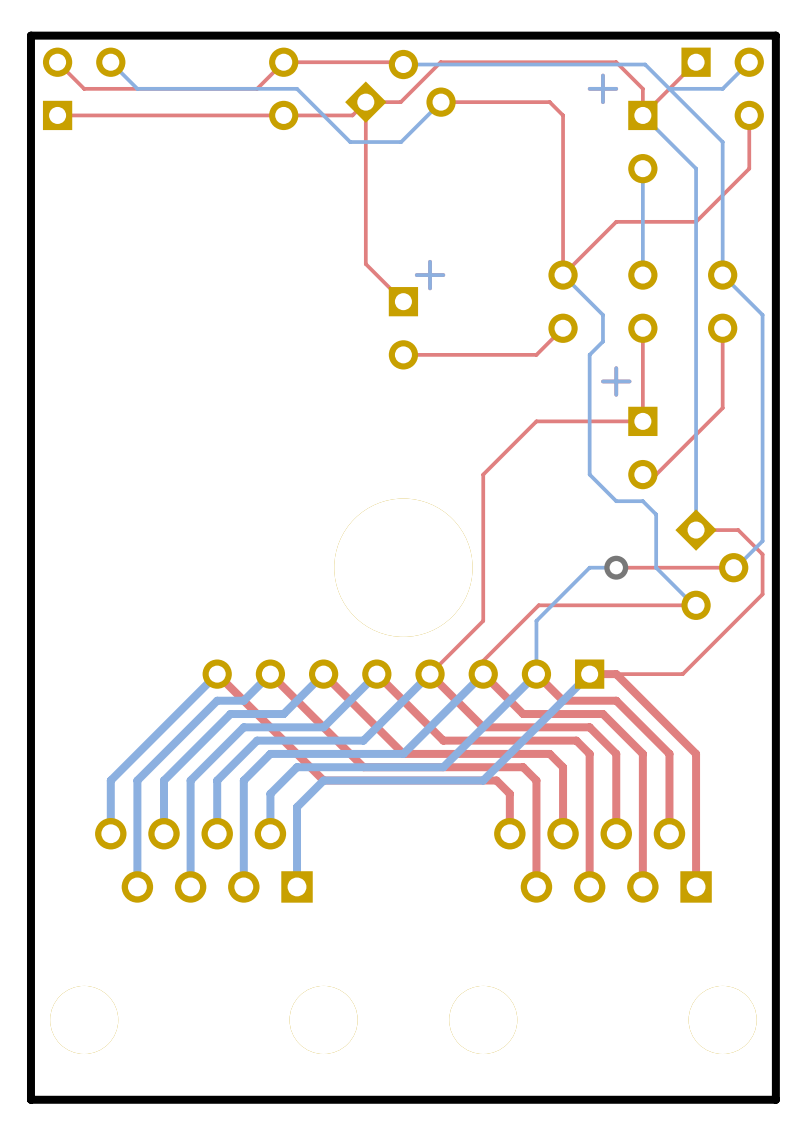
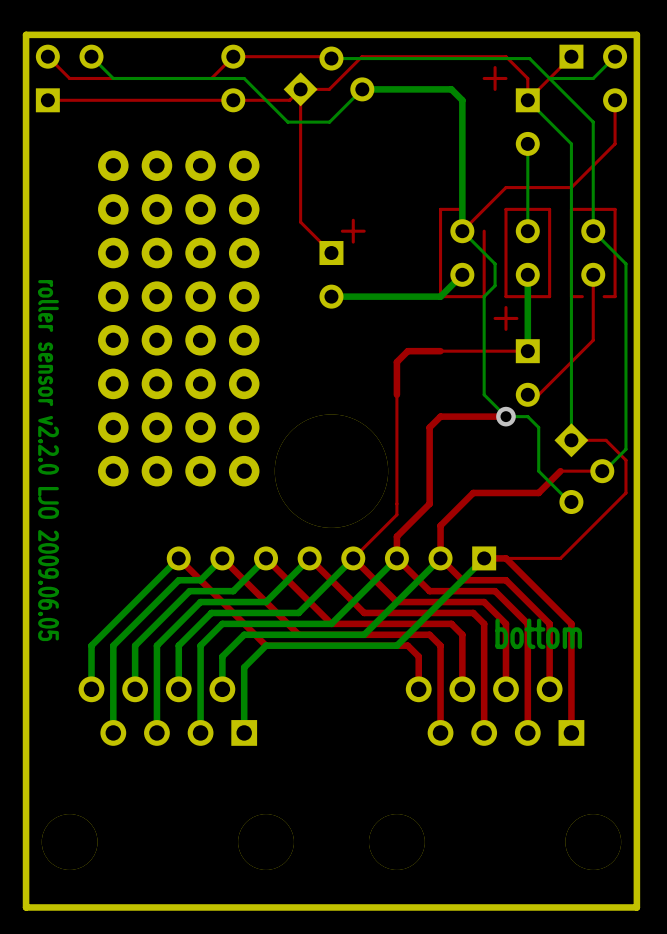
bottom track: (602, 75) (602, 102) -> none
bottom track: (616, 88) (589, 88) -> none
bottom track: none -> (362, 89) (451, 89) (462, 100) (462, 231)
top track: (441, 102) (549, 102) (563, 115) (563, 275) -> none
top track: none -> (462, 209) (440, 209) (440, 296) (484, 296) (484, 231)
top track: none -> (549, 209) (505, 209) (505, 296) (549, 296) (549, 209)
bottom track: (430, 261) (430, 288) -> none
bottom track: (443, 275) (416, 275) -> none
bottom track: none -> (462, 274) (440, 296) (331, 296)
top track: (563, 328) (536, 354) (403, 354) -> none
bottom track: none -> (527, 274) (527, 351)
top track: (642, 328) (642, 421) -> none
top track: none -> (604, 296) (615, 296) (615, 209) (571, 209) (571, 296) (582, 296)
bottom track: (616, 368) (616, 394) -> none
part: none -> (178, 318)
bottom track: (629, 381) (602, 381) -> none
top track: (536, 421) (483, 474) -> (440, 351) (407, 351) (396, 362) (396, 394)
text: none -> roller sensor v2.2.0 LJO 2009.06.05 (48, 460)
bottom track: (616, 567) (589, 567) (536, 620) (536, 674) -> none
via position: (616, 567) -> (505, 416)
top track: (682, 567) (616, 567) -> (560, 471) (538, 492) (473, 492) (440, 525) (440, 558)
top track: (696, 605) (538, 605) (483, 660) -> (505, 416) (440, 416) (429, 427) (429, 503) (396, 536) (396, 547)
text: none -> bottom (538, 633)

